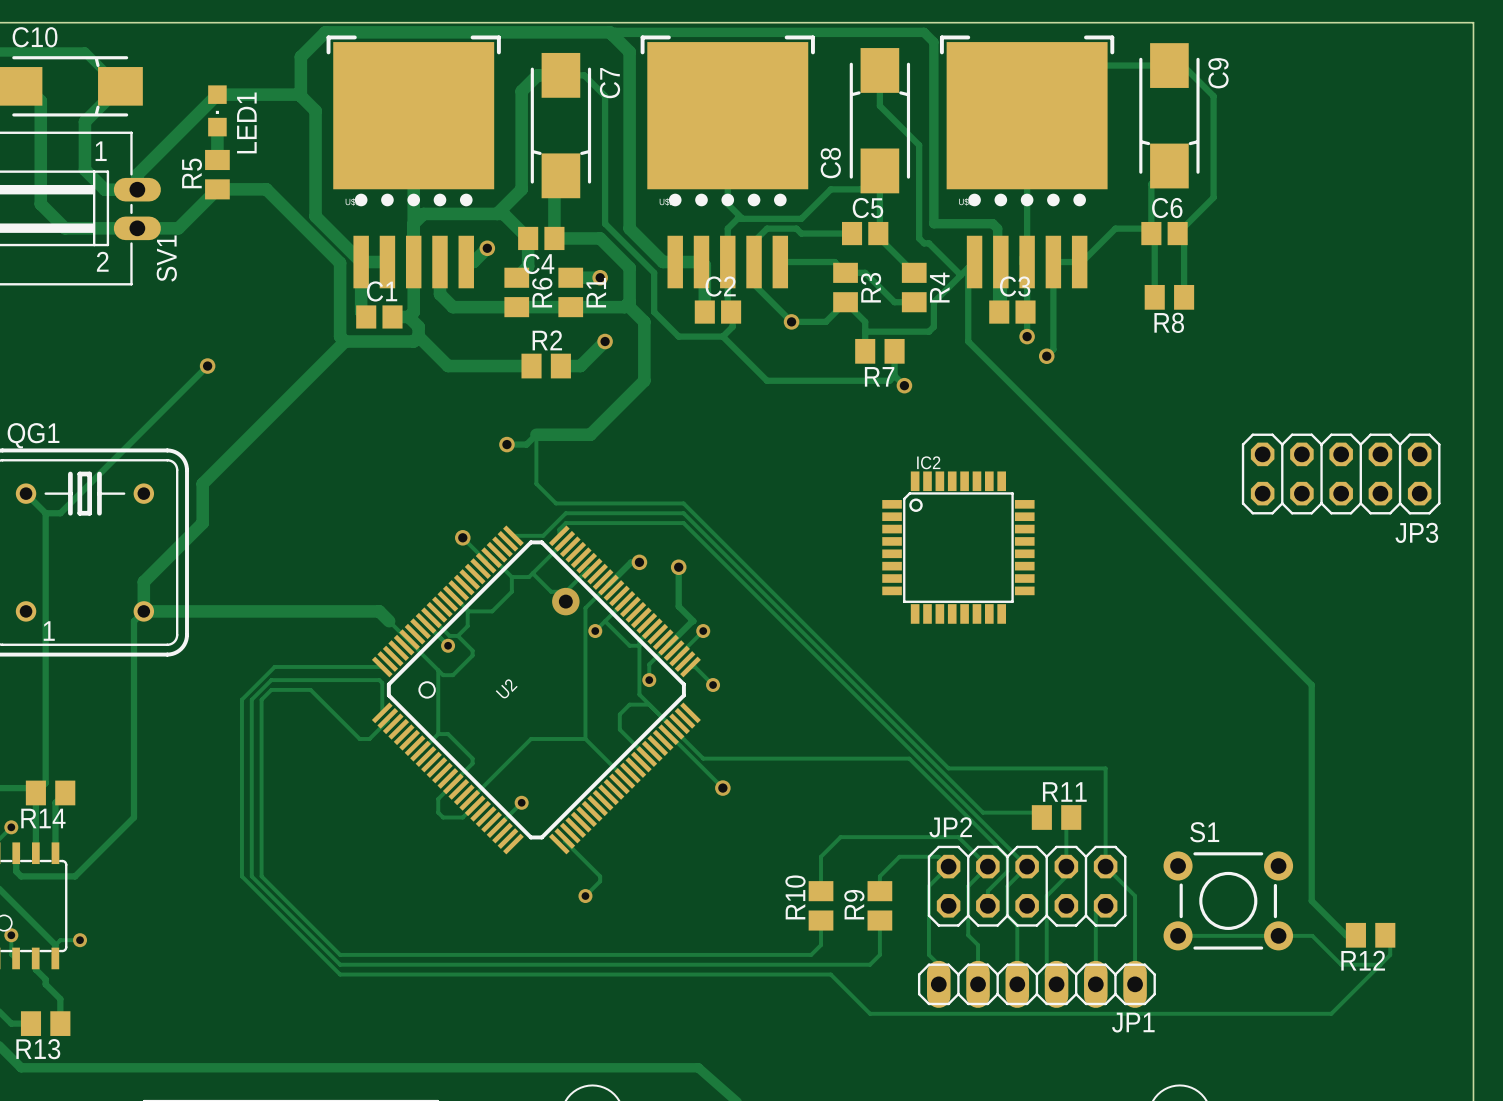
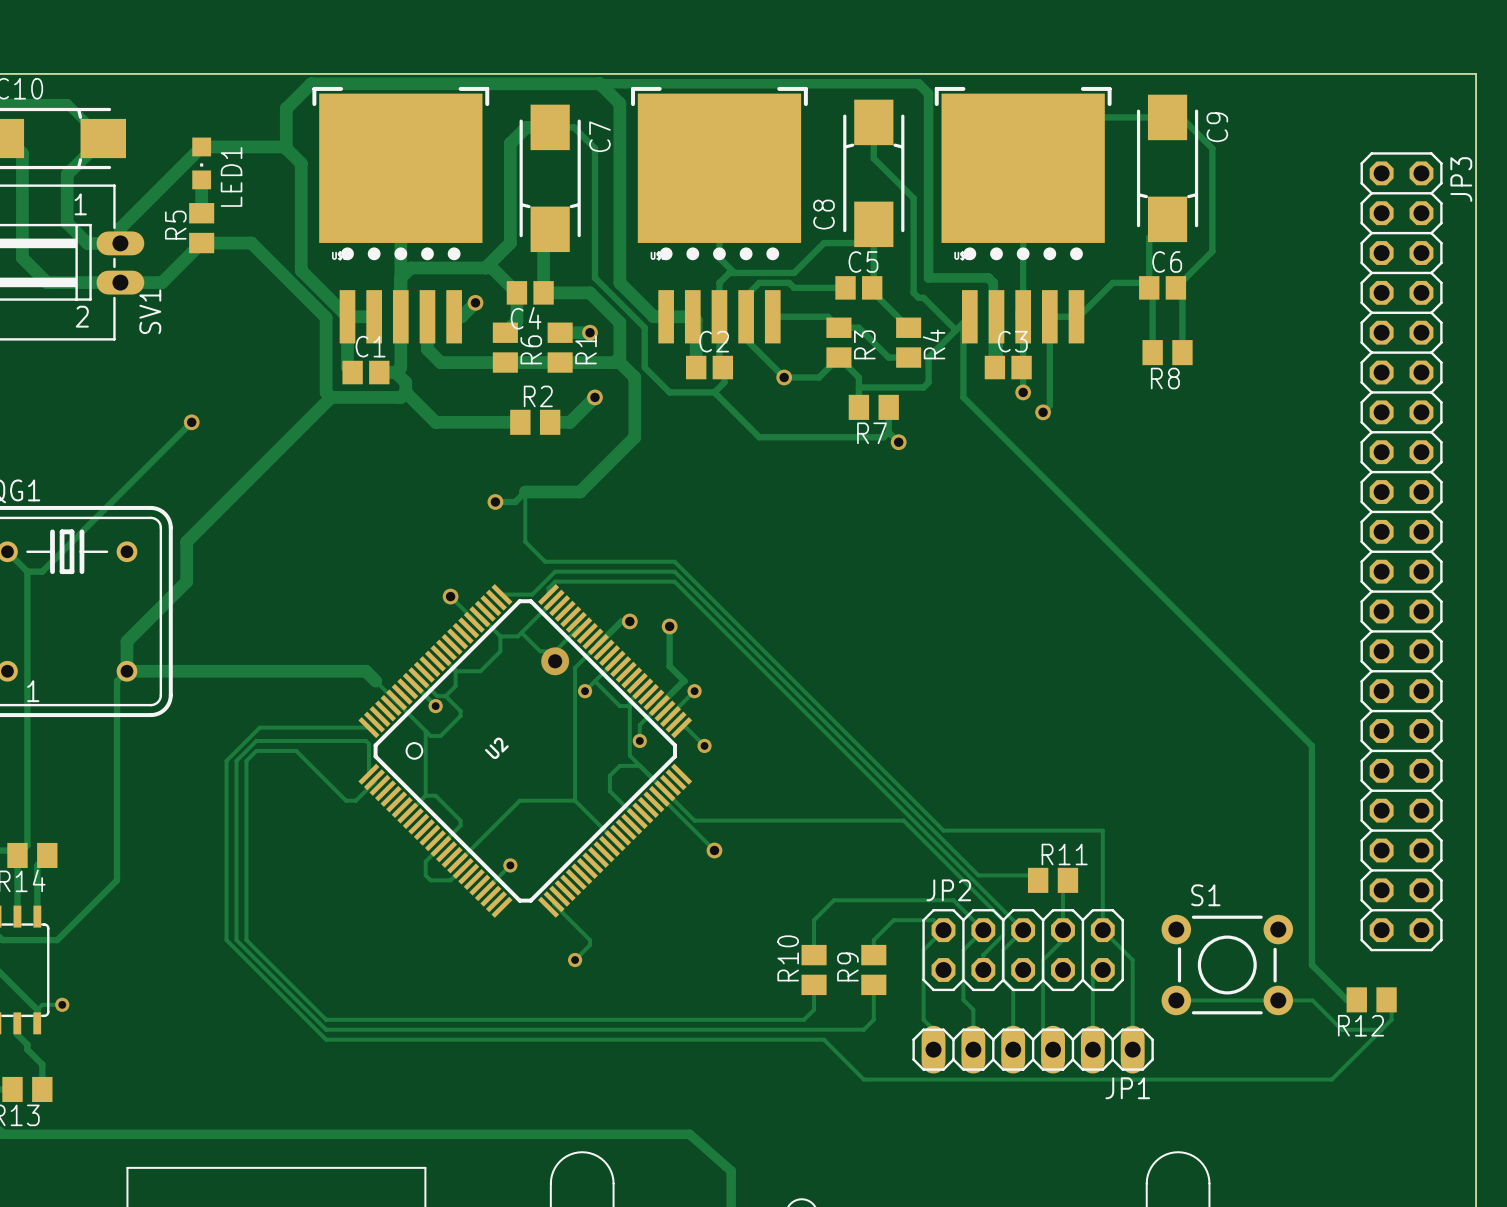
JP3 footprint: [1241, 433, 1441, 515] -> [1360, 152, 1443, 952]
JP3 name position: JP3 (1416, 532) -> JP3 (1461, 179)
IC2: (958, 547) -> none

